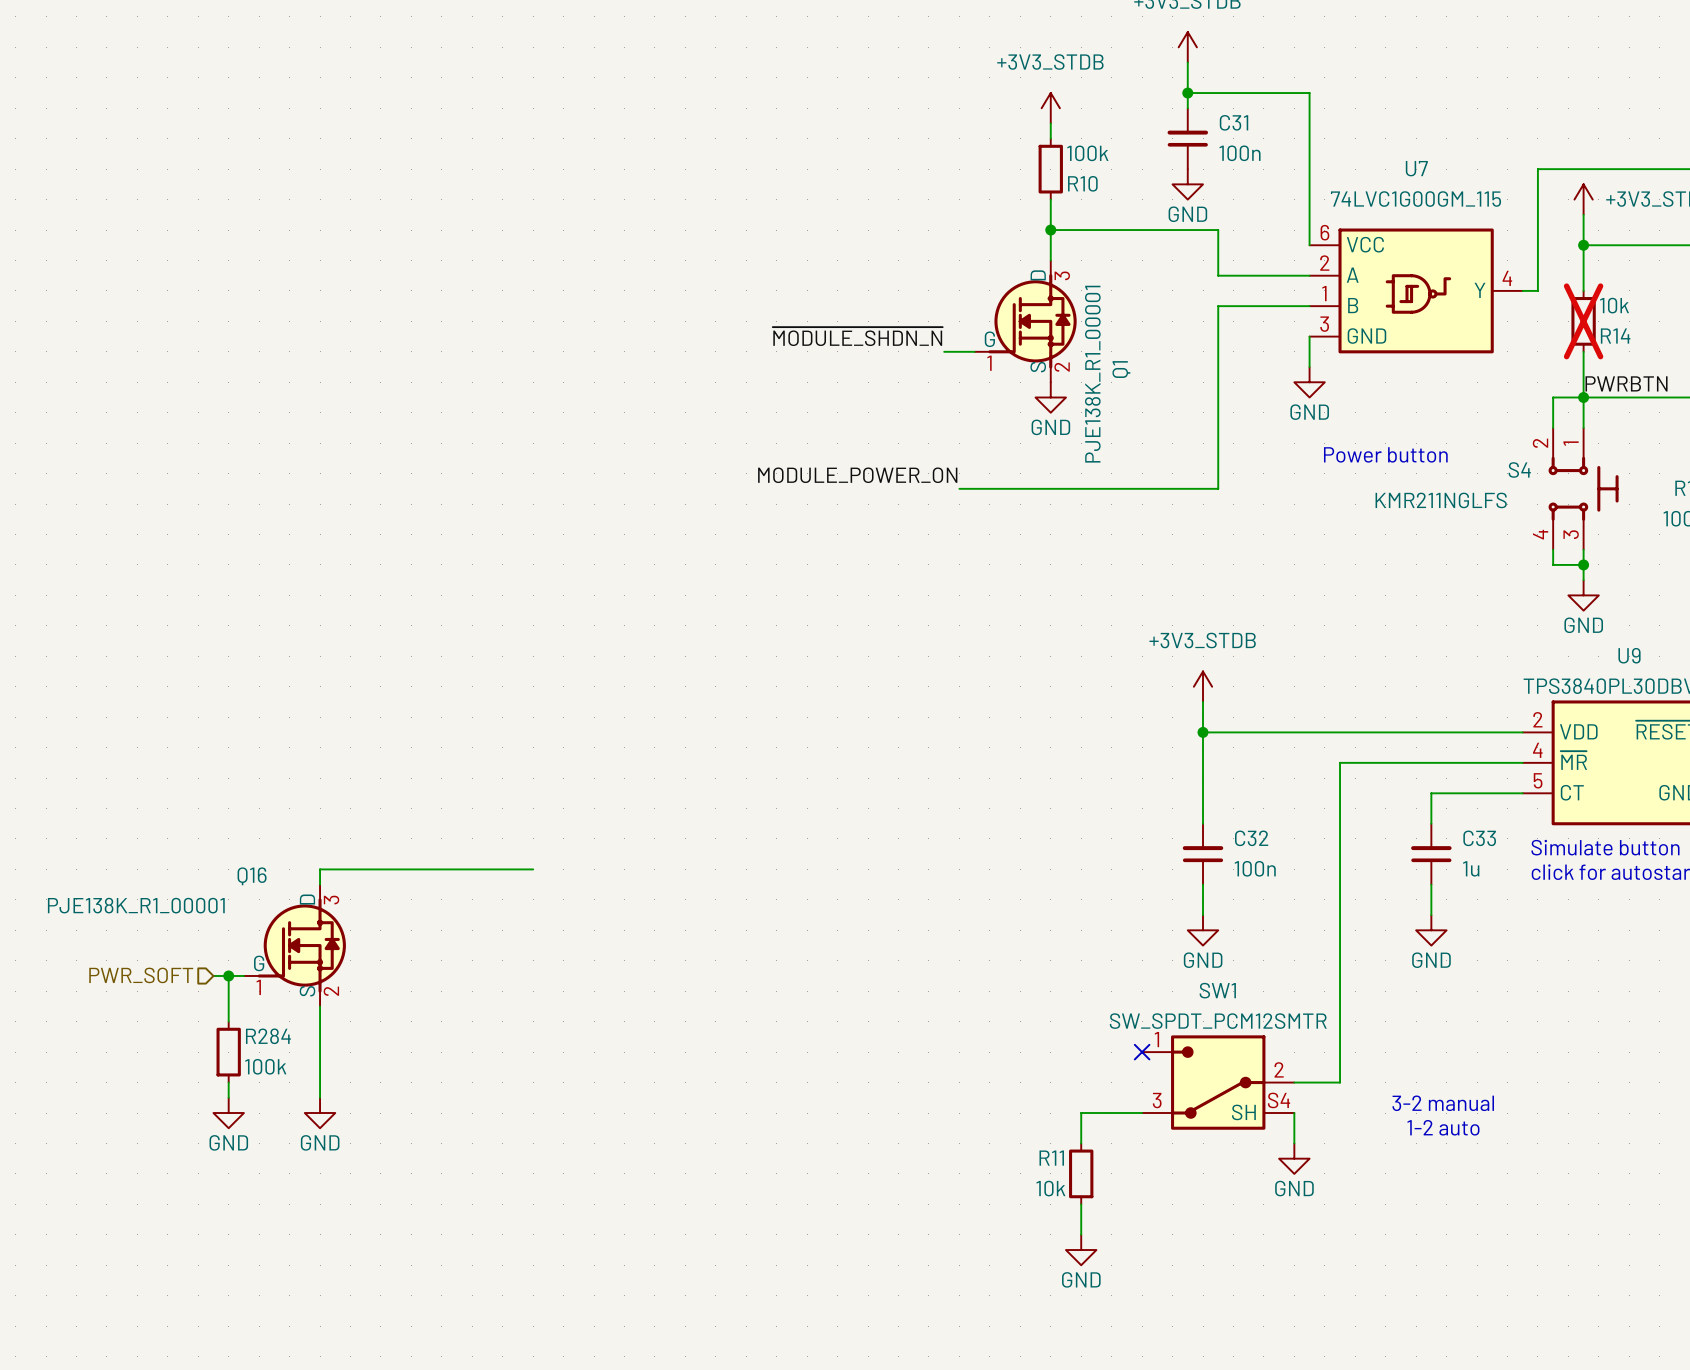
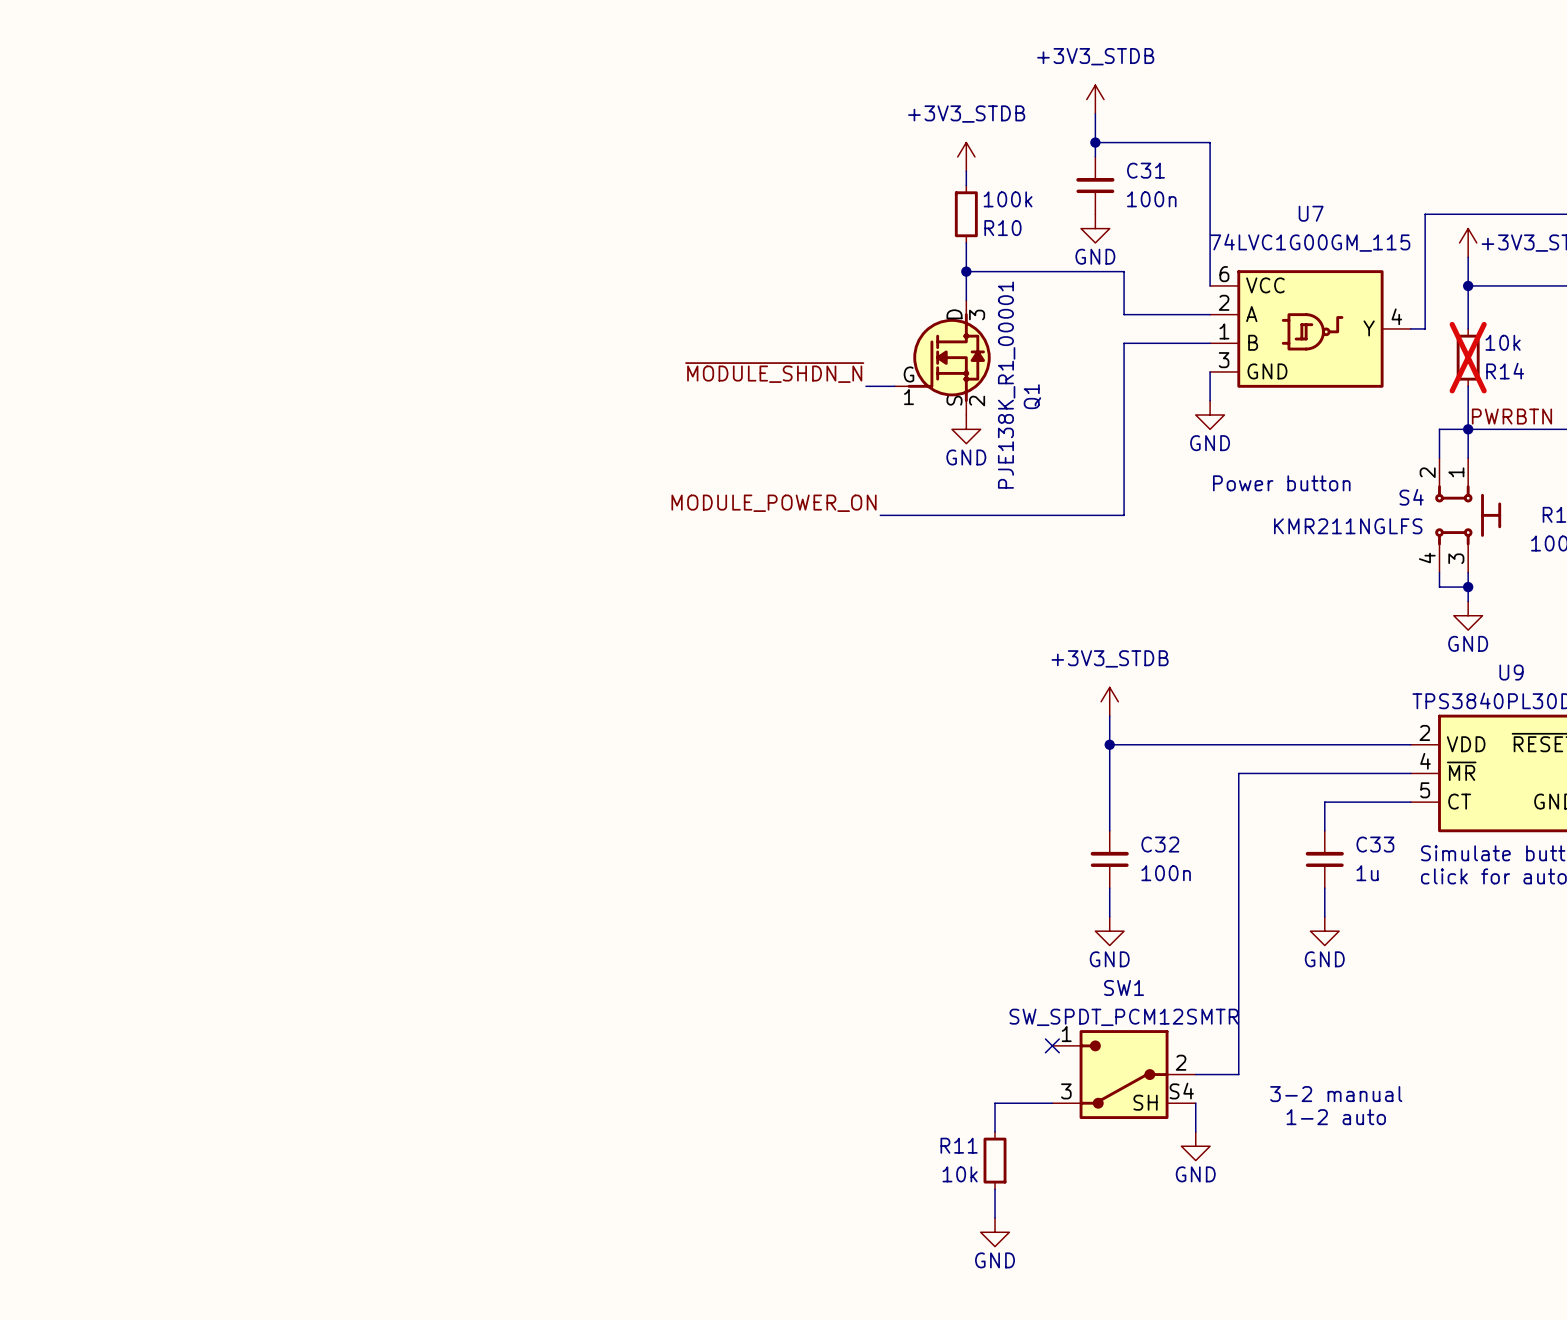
wire: (533, 869) (320, 869) (320, 884) -> none
Q16: (294, 945) -> none
hierarchical label: PWR_SOFT (141, 975) -> none
wire: (213, 975) (243, 975) -> none
wire: (228, 975) (228, 1021) -> none
junction: (228, 975) -> none
wire: (320, 1006) (320, 1097) -> none
R284: (228, 1052) -> none
wire: (228, 1082) (228, 1097) -> none
power symbol: GND (228, 1113) -> none
power symbol: GND (320, 1113) -> none

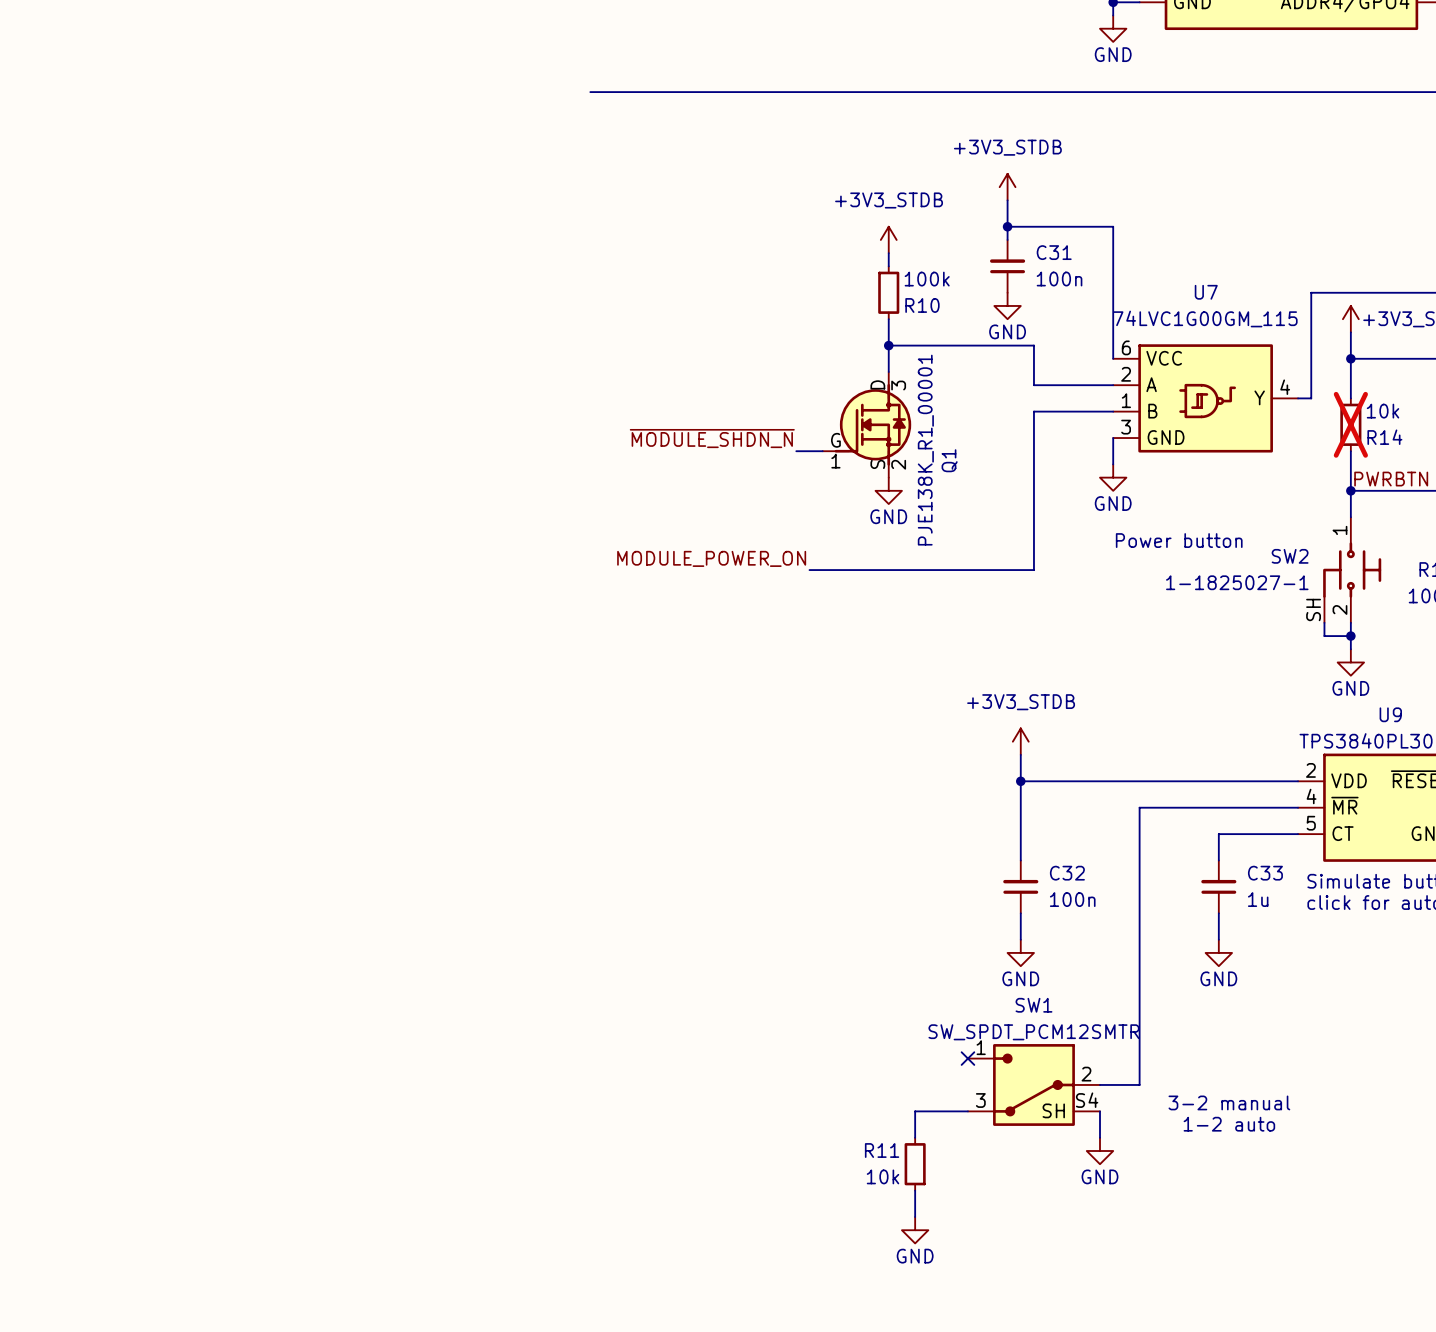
wire: (1468, 429) (1439, 429) (1439, 458) -> none
S4: (1468, 515) -> none
SW2: none -> (1352, 570)

